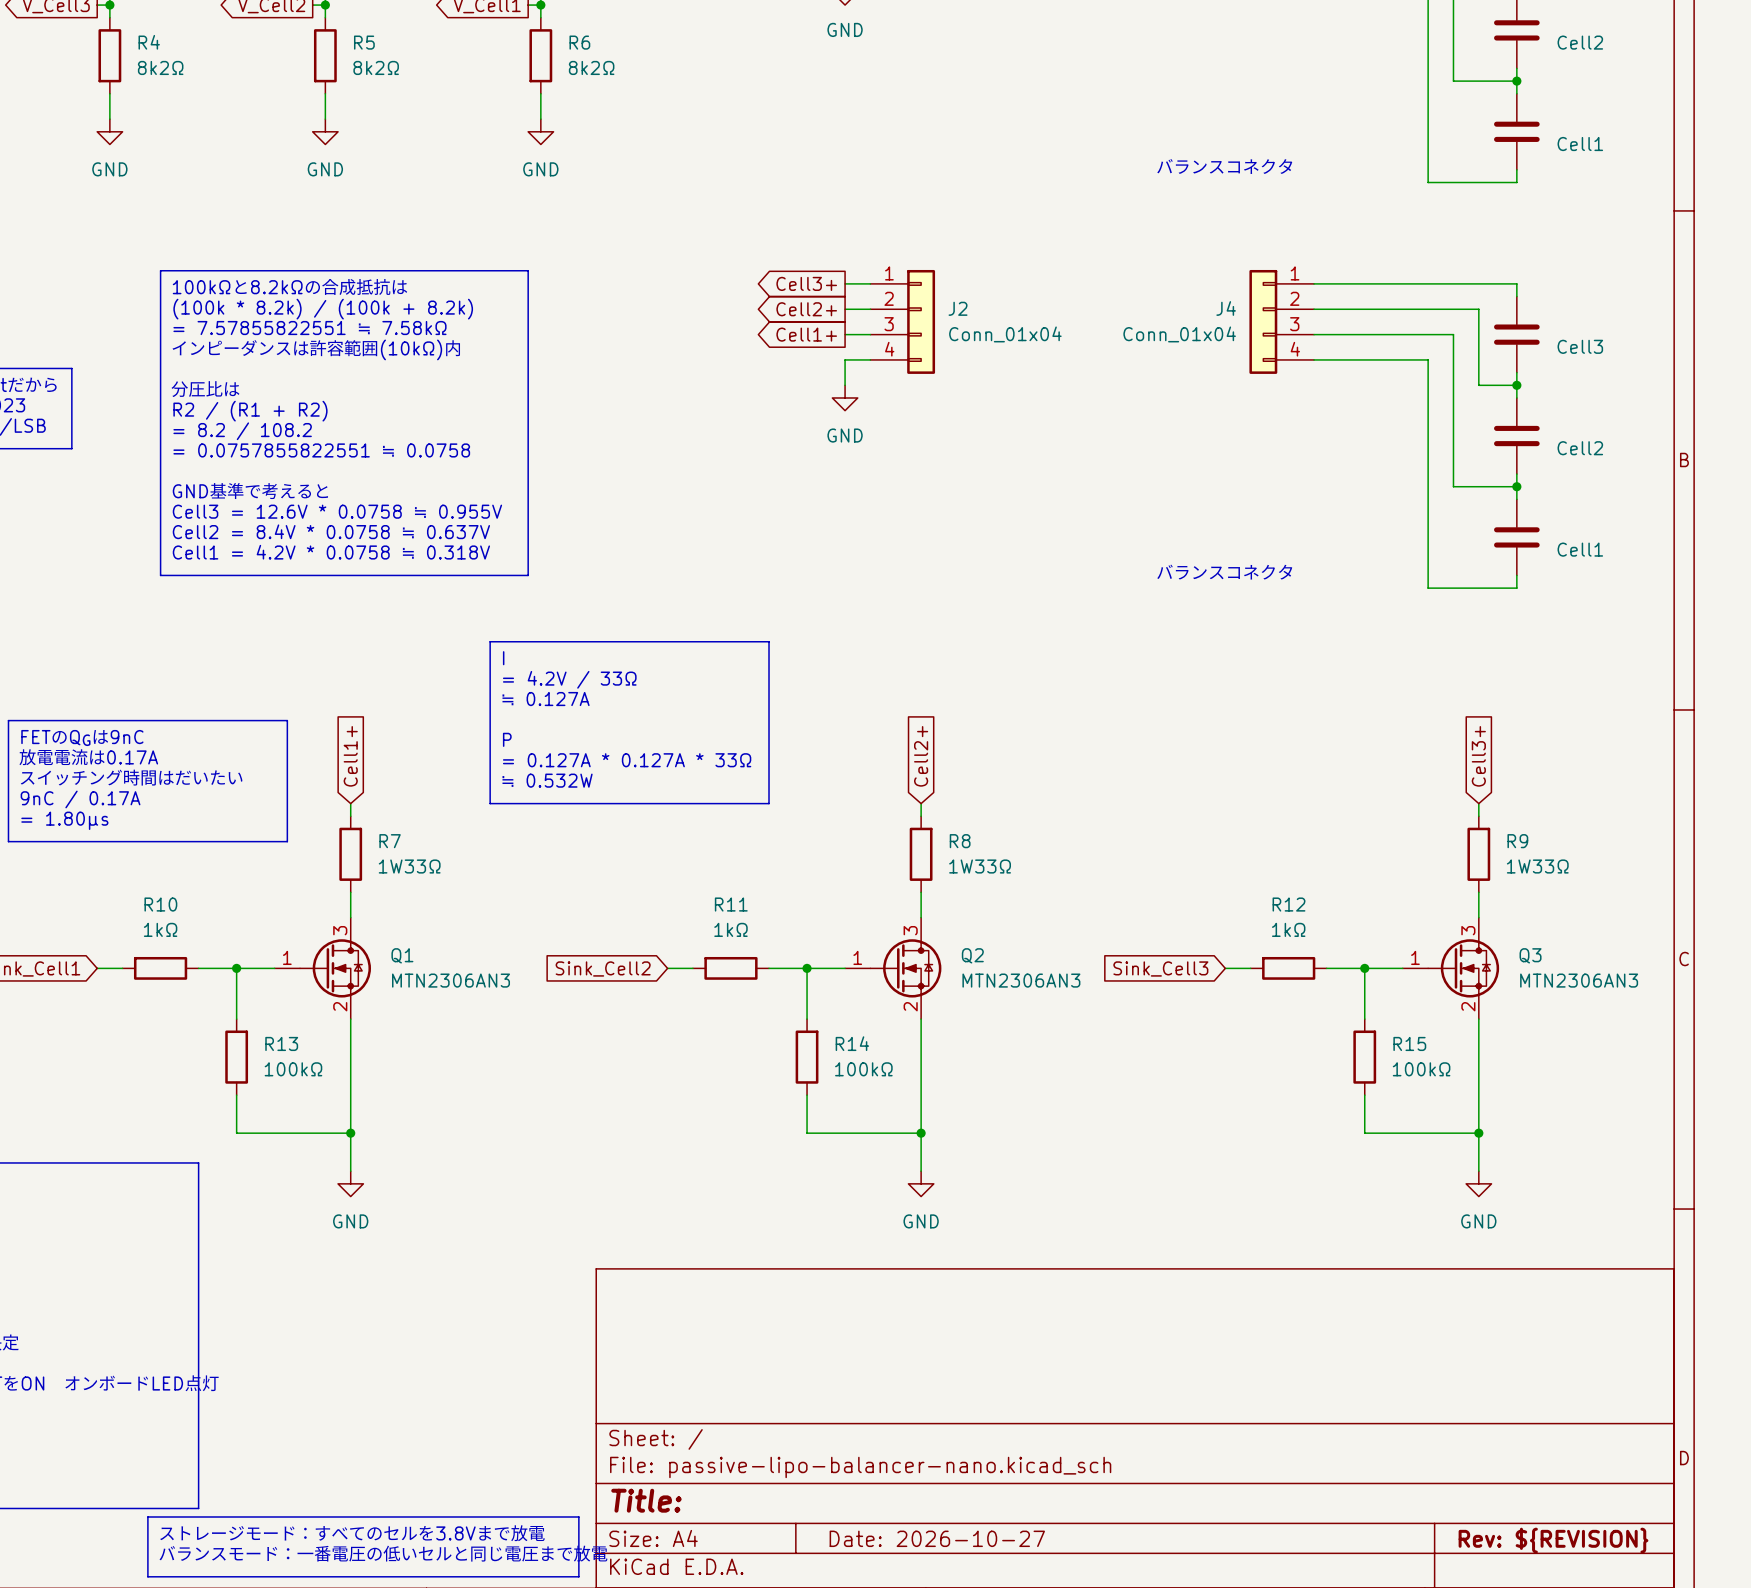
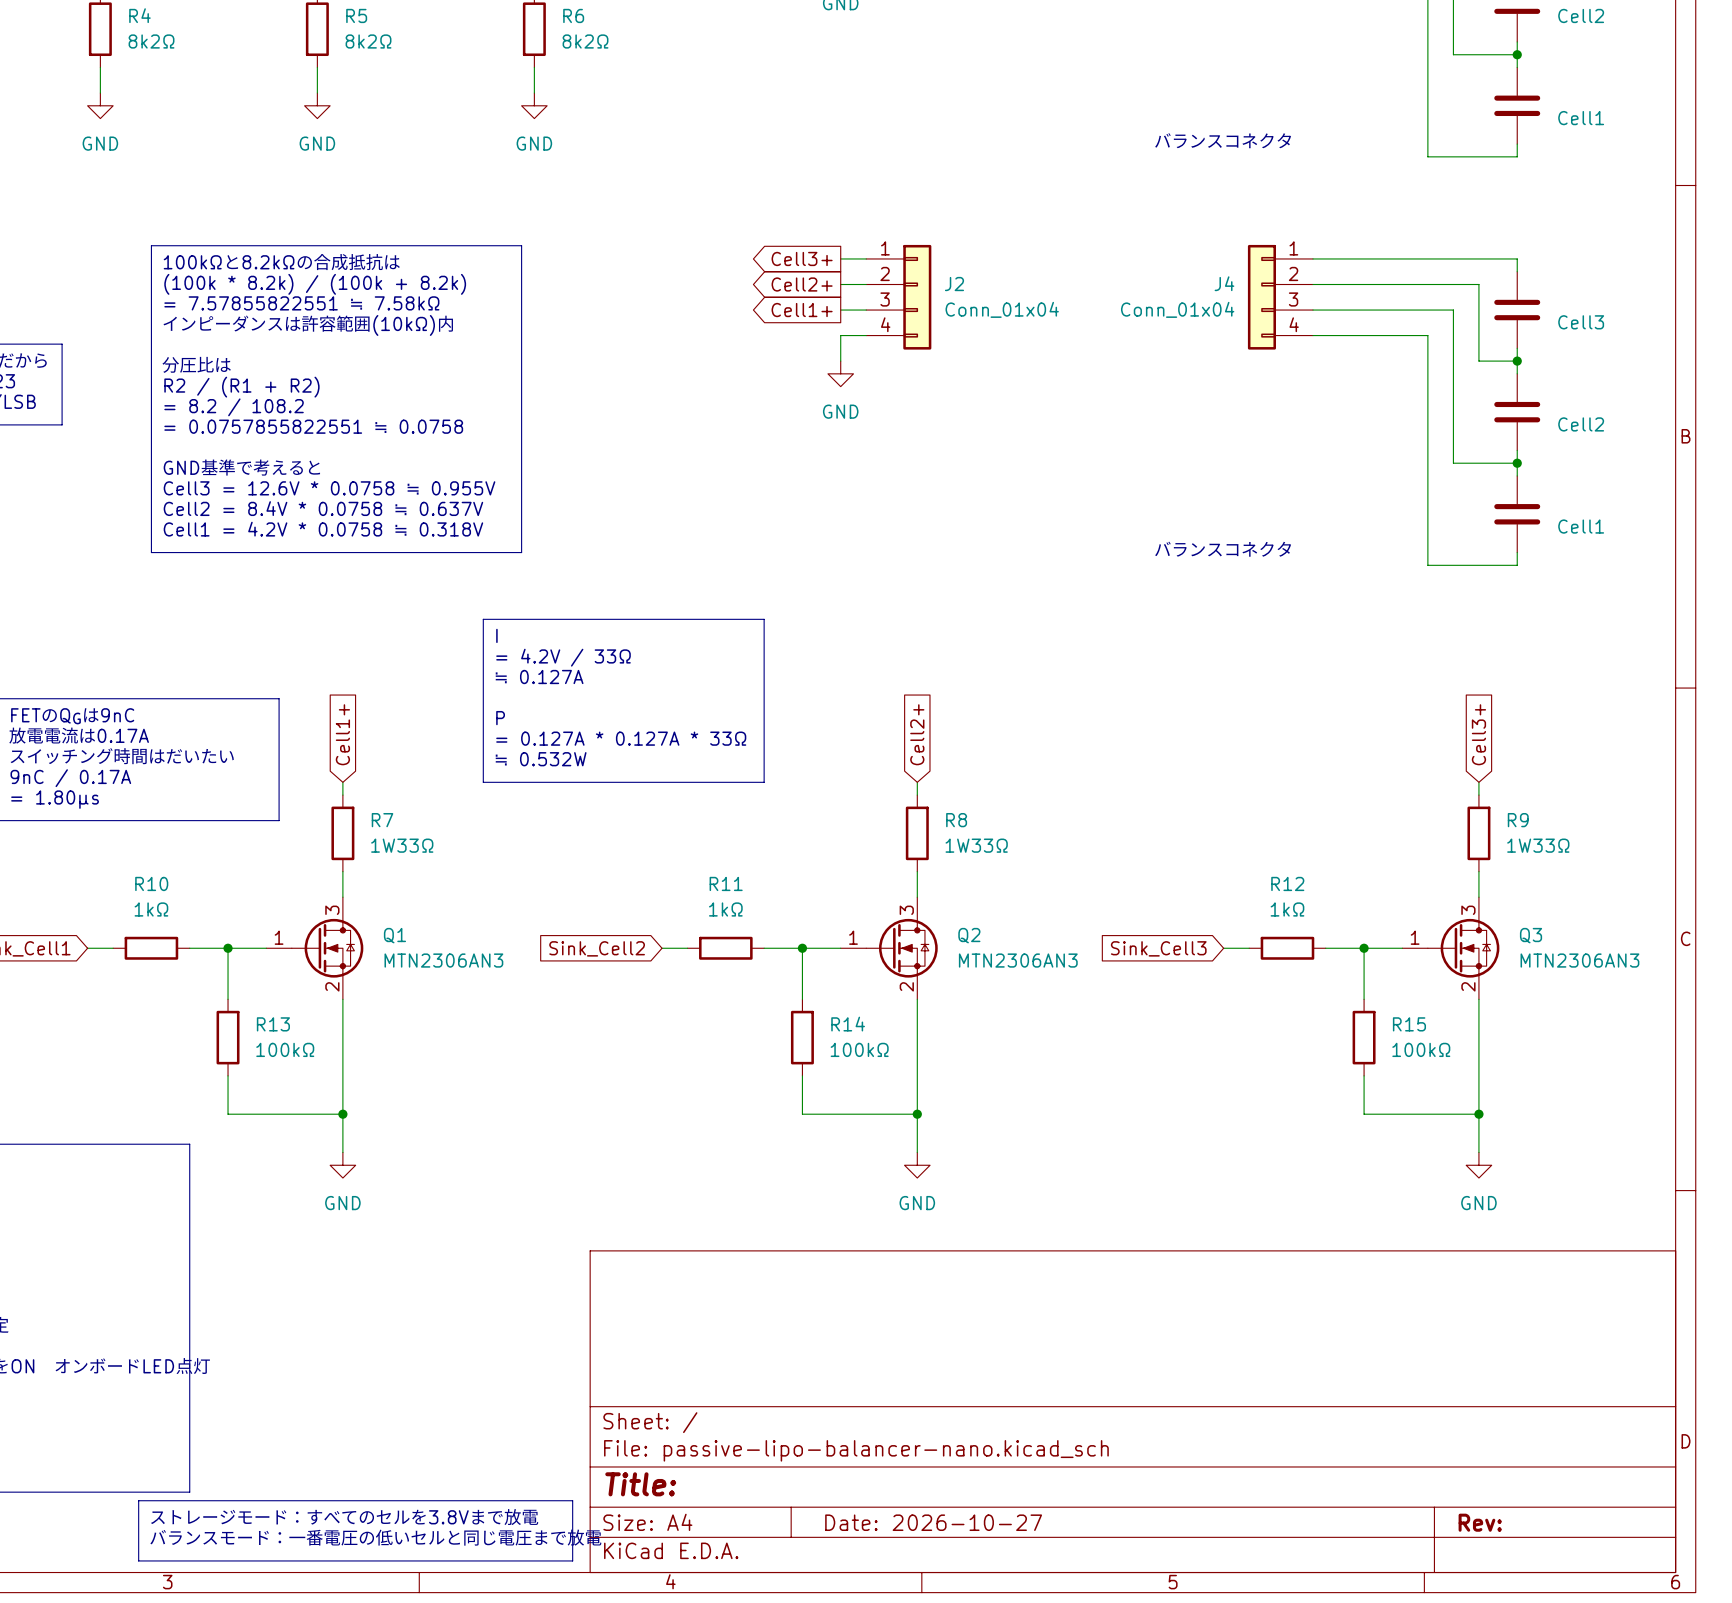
title block: Rev: ${REVISION} (1553, 1540) -> Rev: (1480, 1522)

